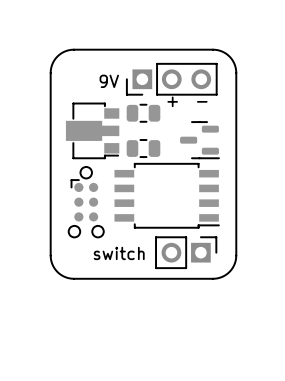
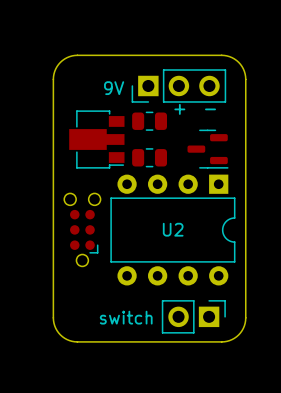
part: (167, 195) -> none
part rotation: 0° (86, 202) -> 180° (82, 229)
U2: none -> (172, 230)
part position: (186, 252) -> (193, 316)
text position: switch (119, 253) -> switch (126, 317)
board edge: (50, 255) (52, 265) (57, 271) (63, 276) (73, 278) (215, 278) (229, 271) (233, 265) (236, 255) -> (53, 268) (54, 325) (64, 338) (77, 341) (221, 341) (232, 339) (240, 332) (245, 323) (245, 268)

